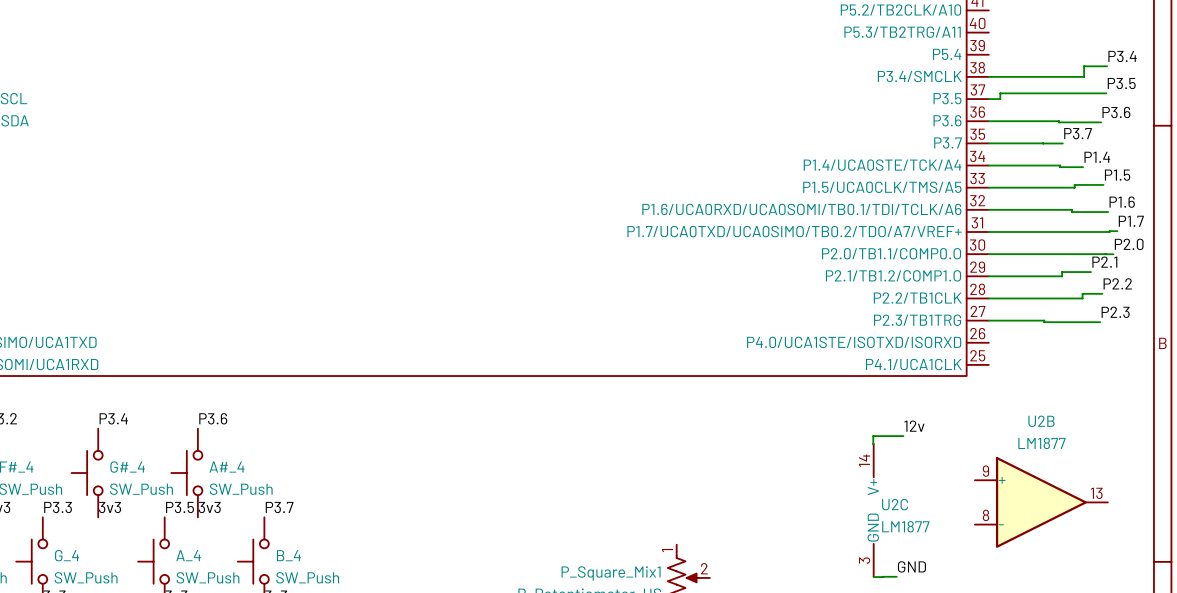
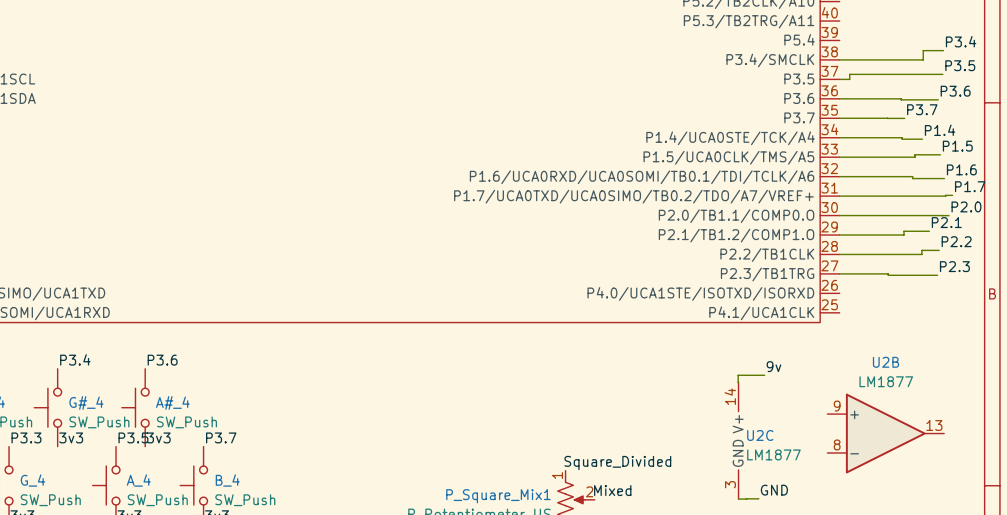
label: 12v (914, 426) -> 9v (773, 366)
label: none -> Square_Divided (617, 462)
label: none -> Mixed (612, 490)

